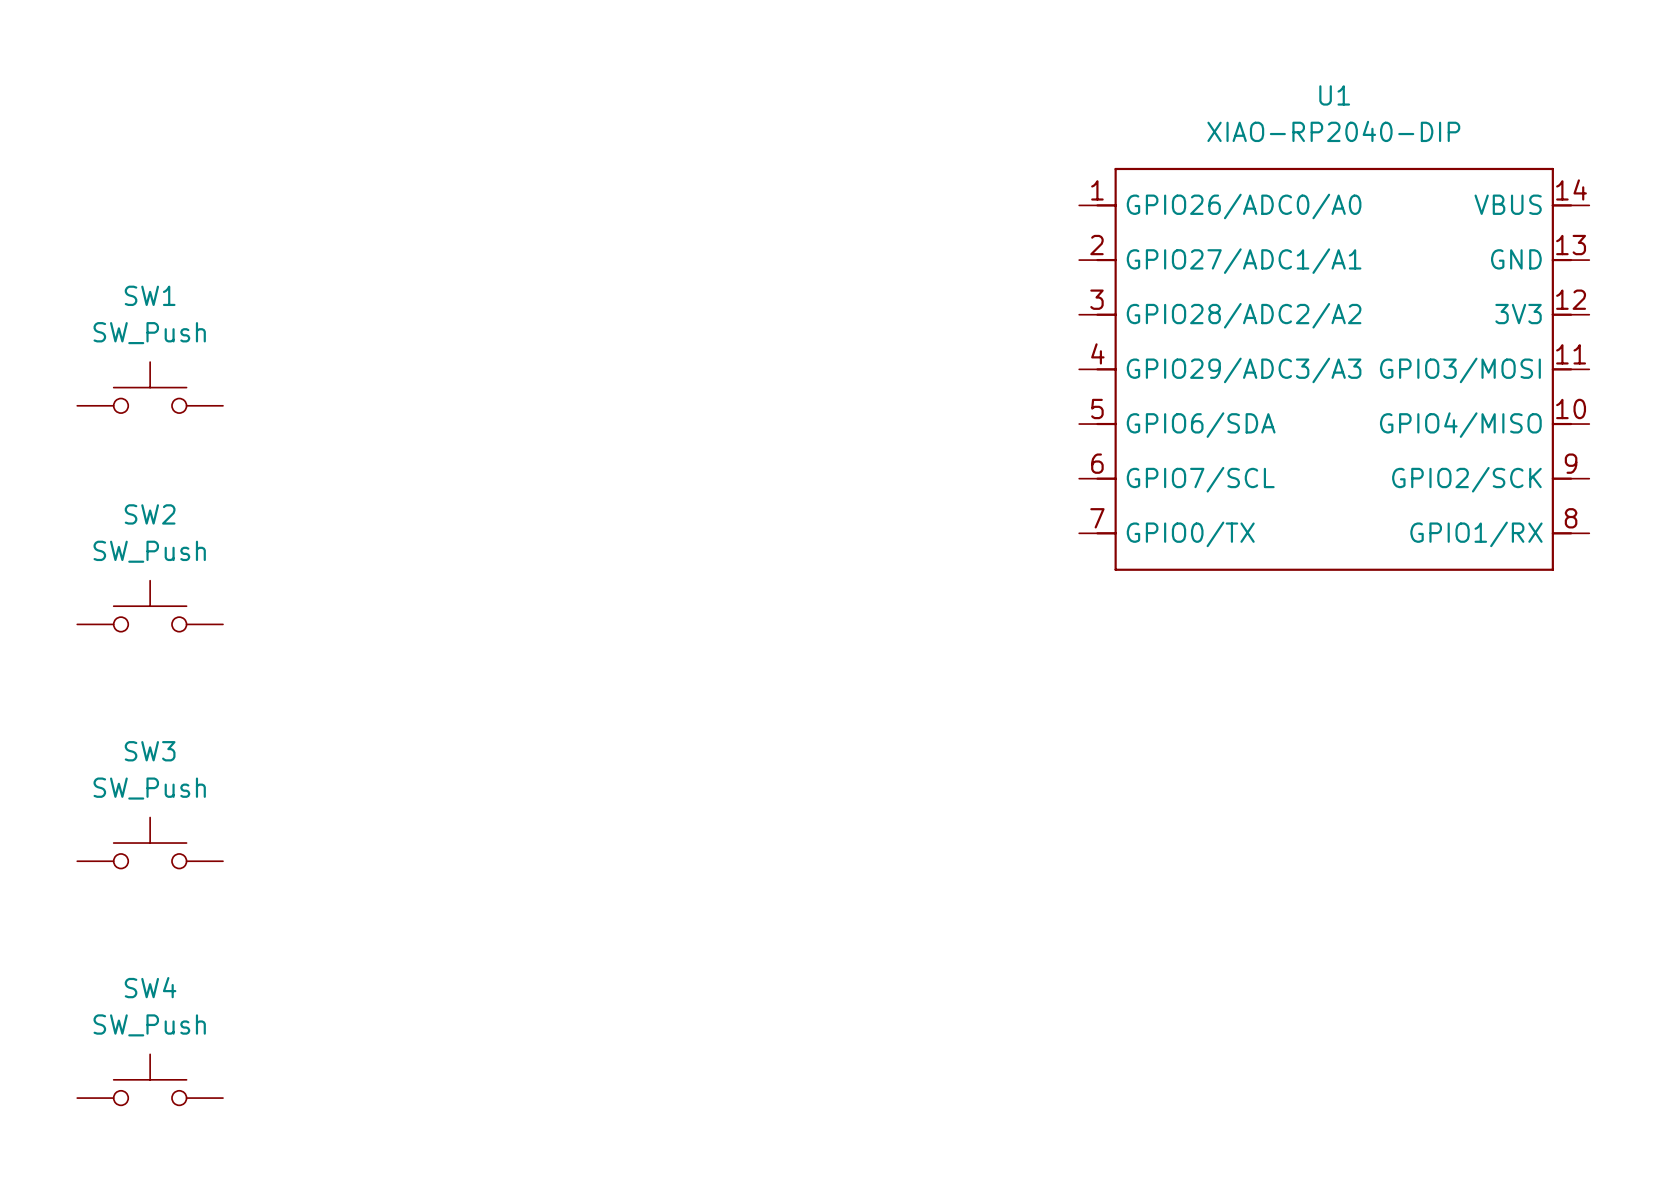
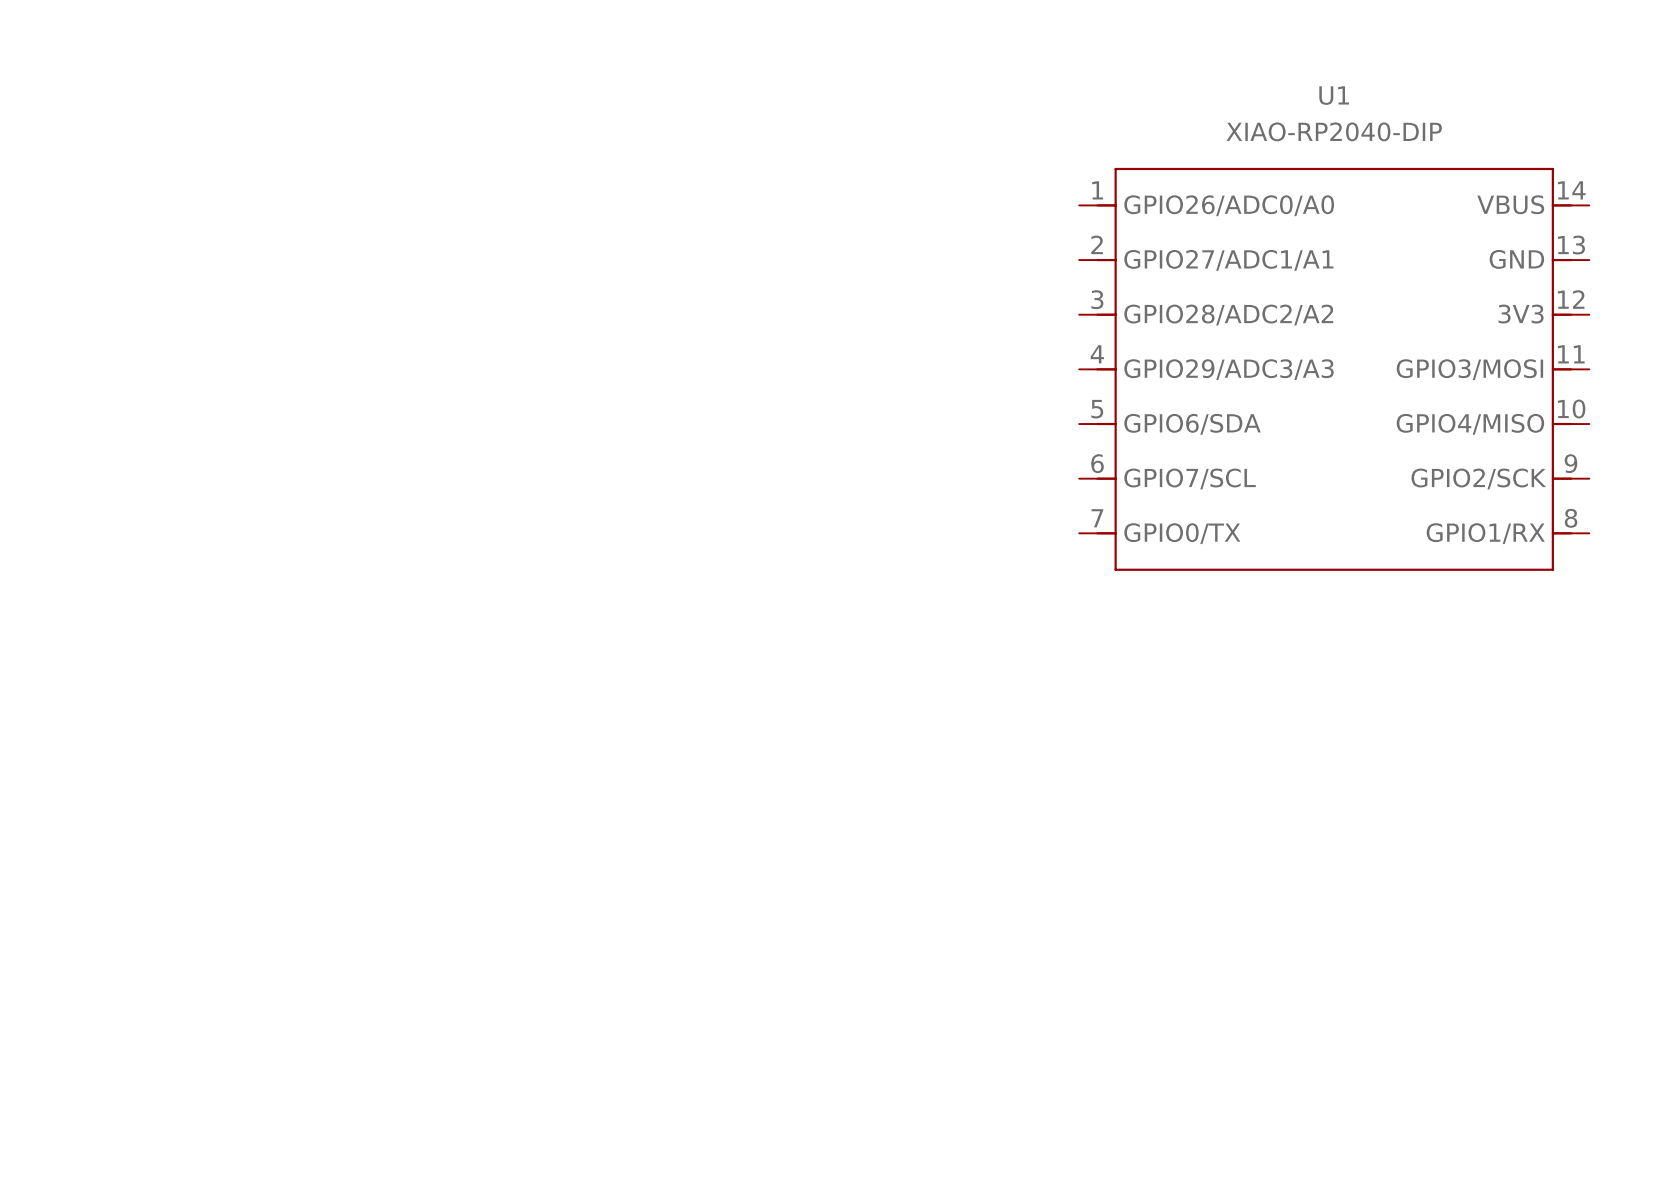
SW1: SW_Push (150, 387) -> none
SW2: SW_Push (150, 606) -> none
SW3: SW_Push (150, 843) -> none
SW4: SW_Push (150, 1079) -> none

